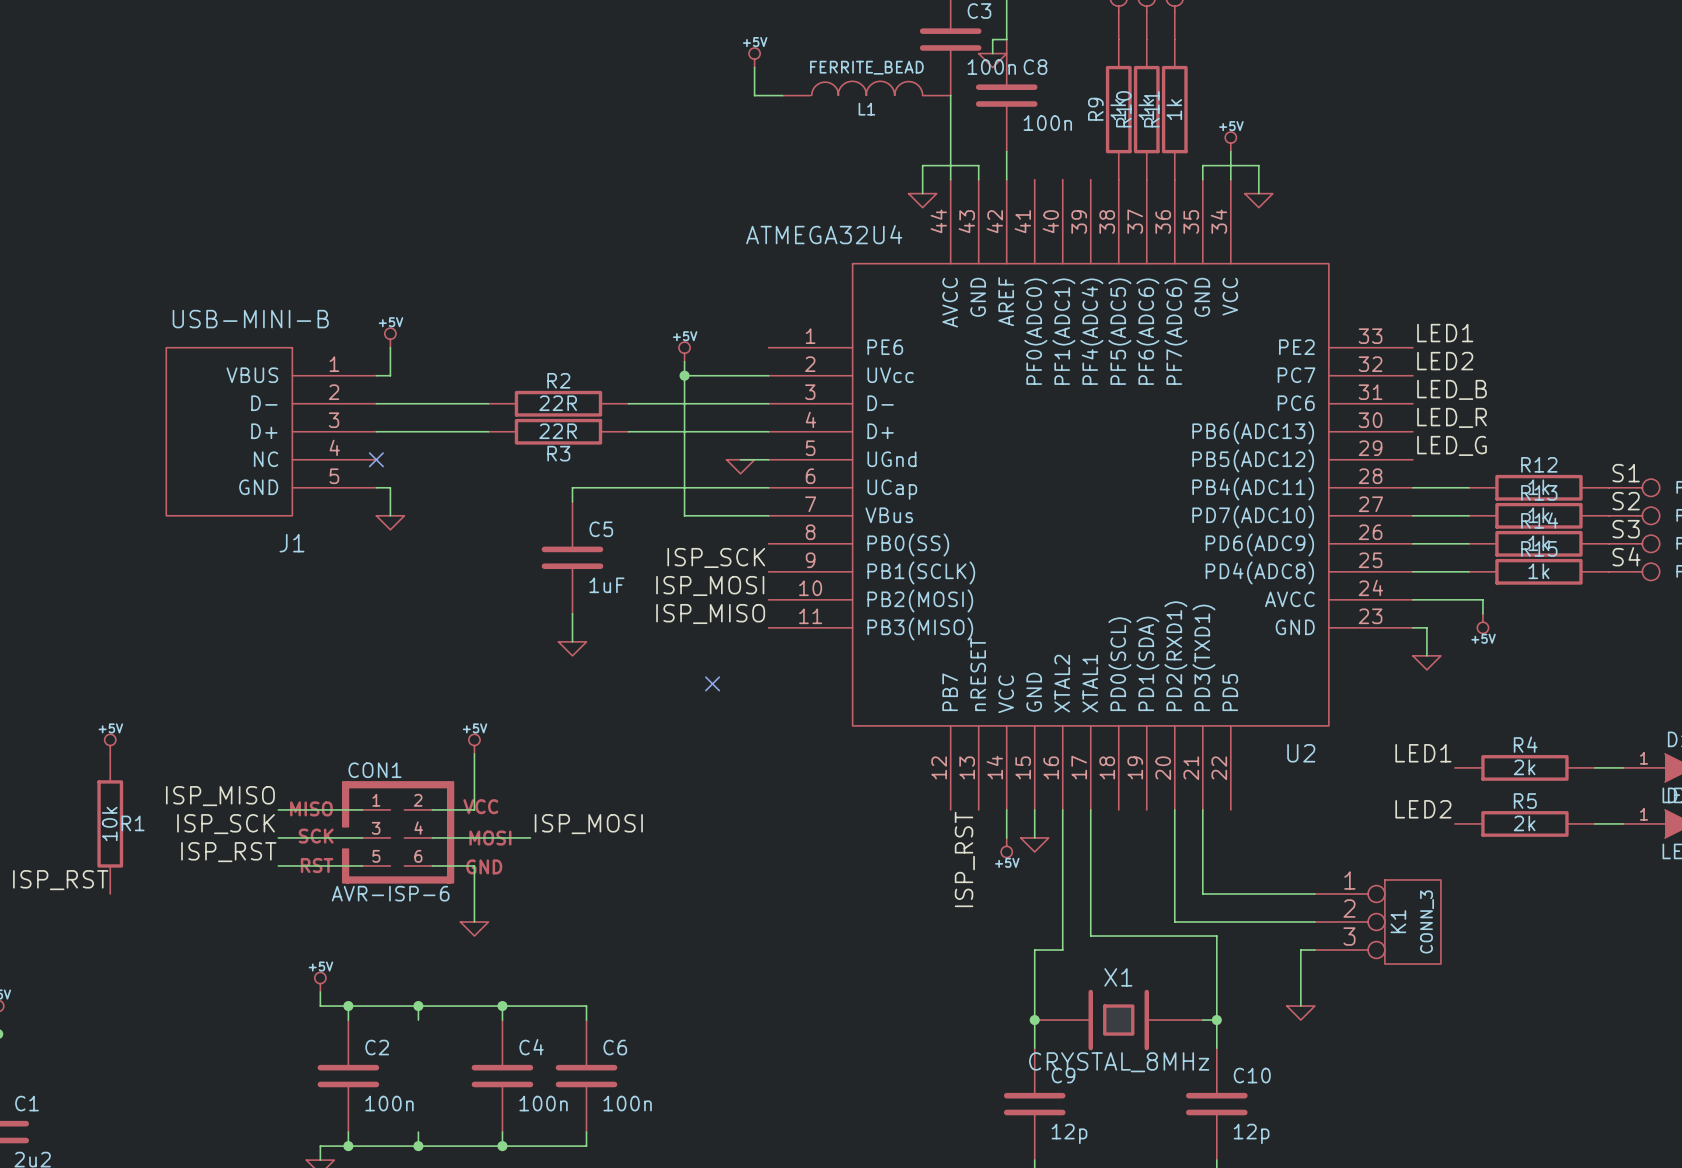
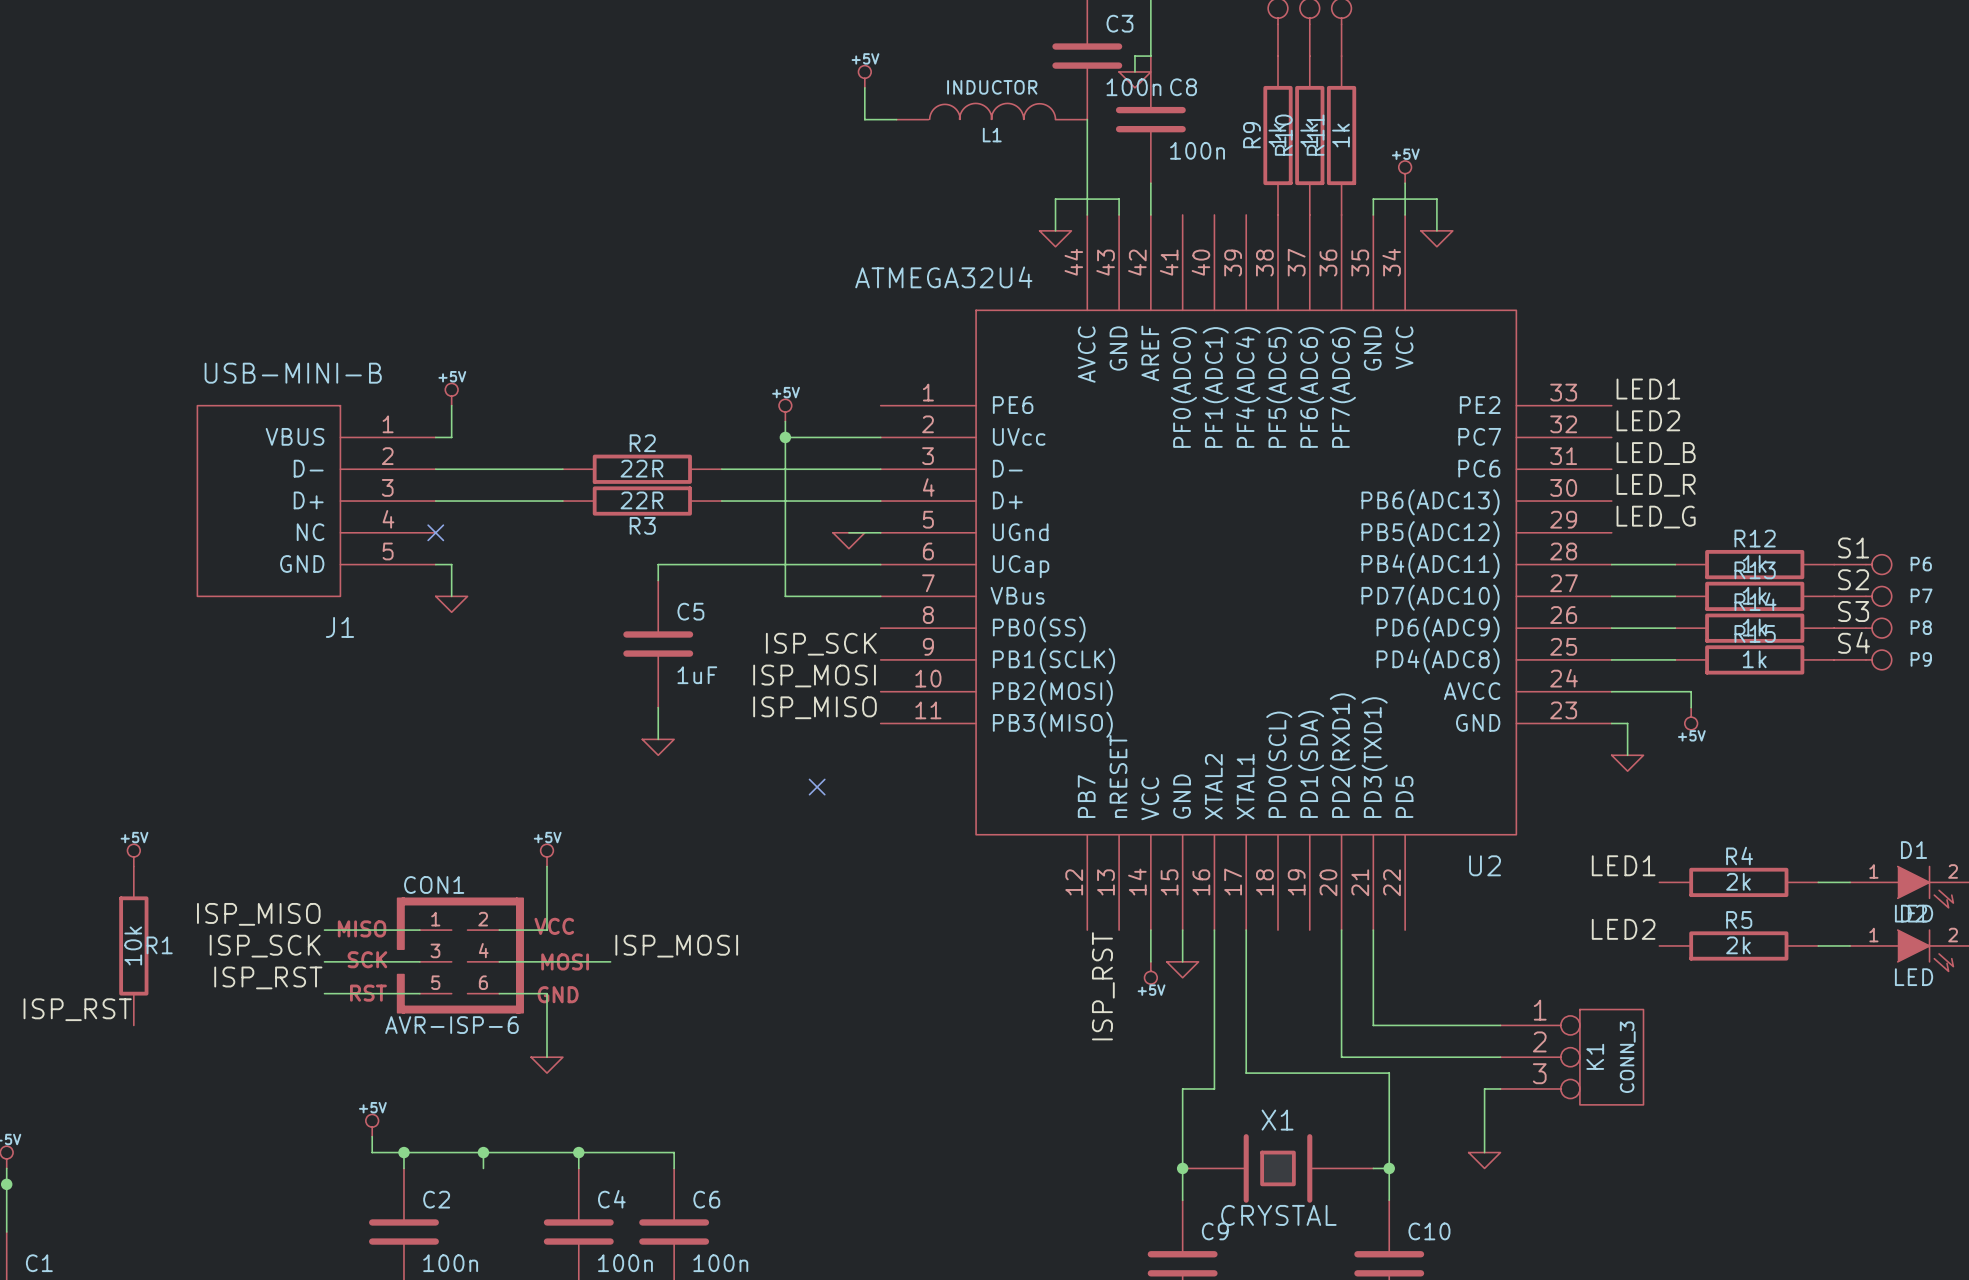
L1 value: FERRITE_BEAD (866, 67) -> INDUCTOR (992, 87)
X1 value: CRYSTAL_8MHz (1119, 1062) -> CRYSTAL (1278, 1215)

